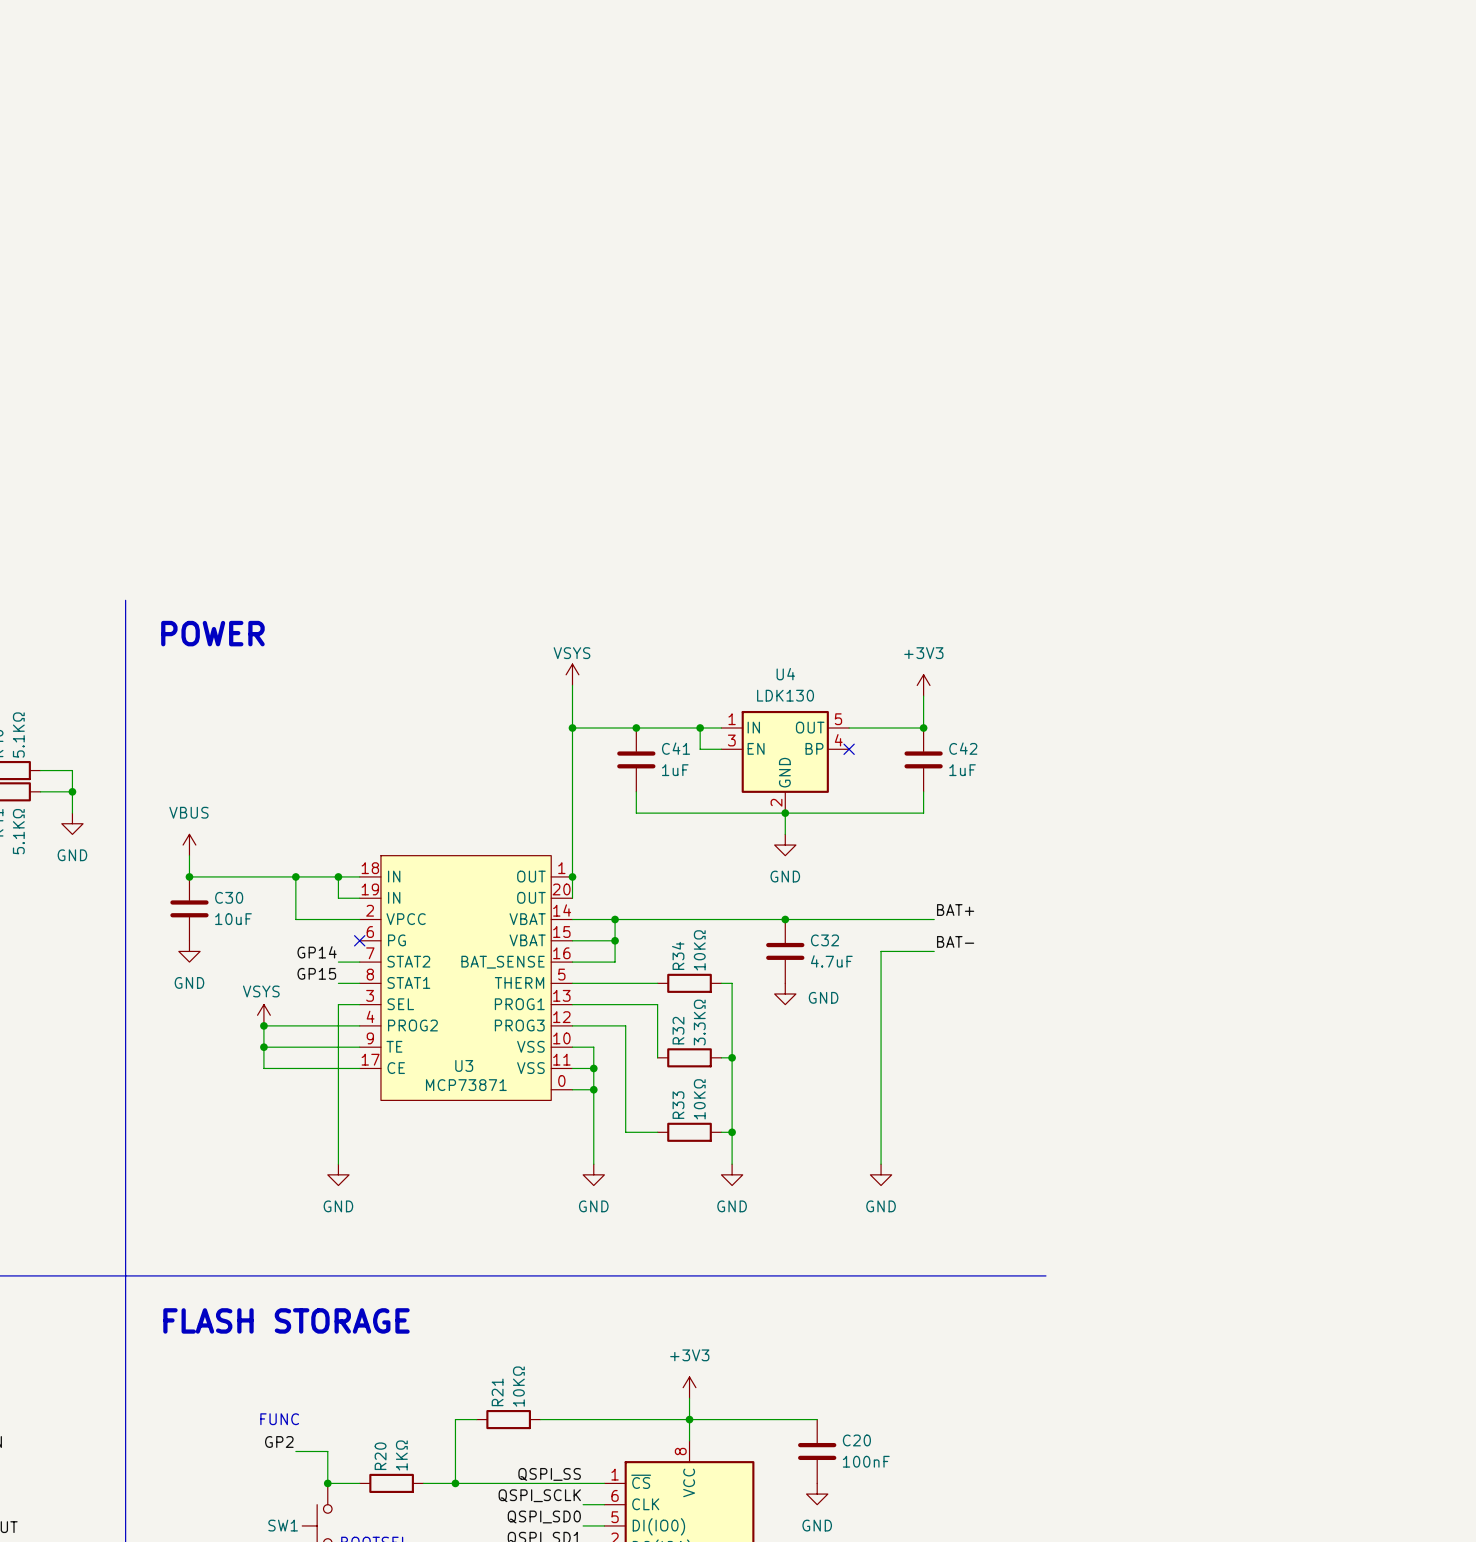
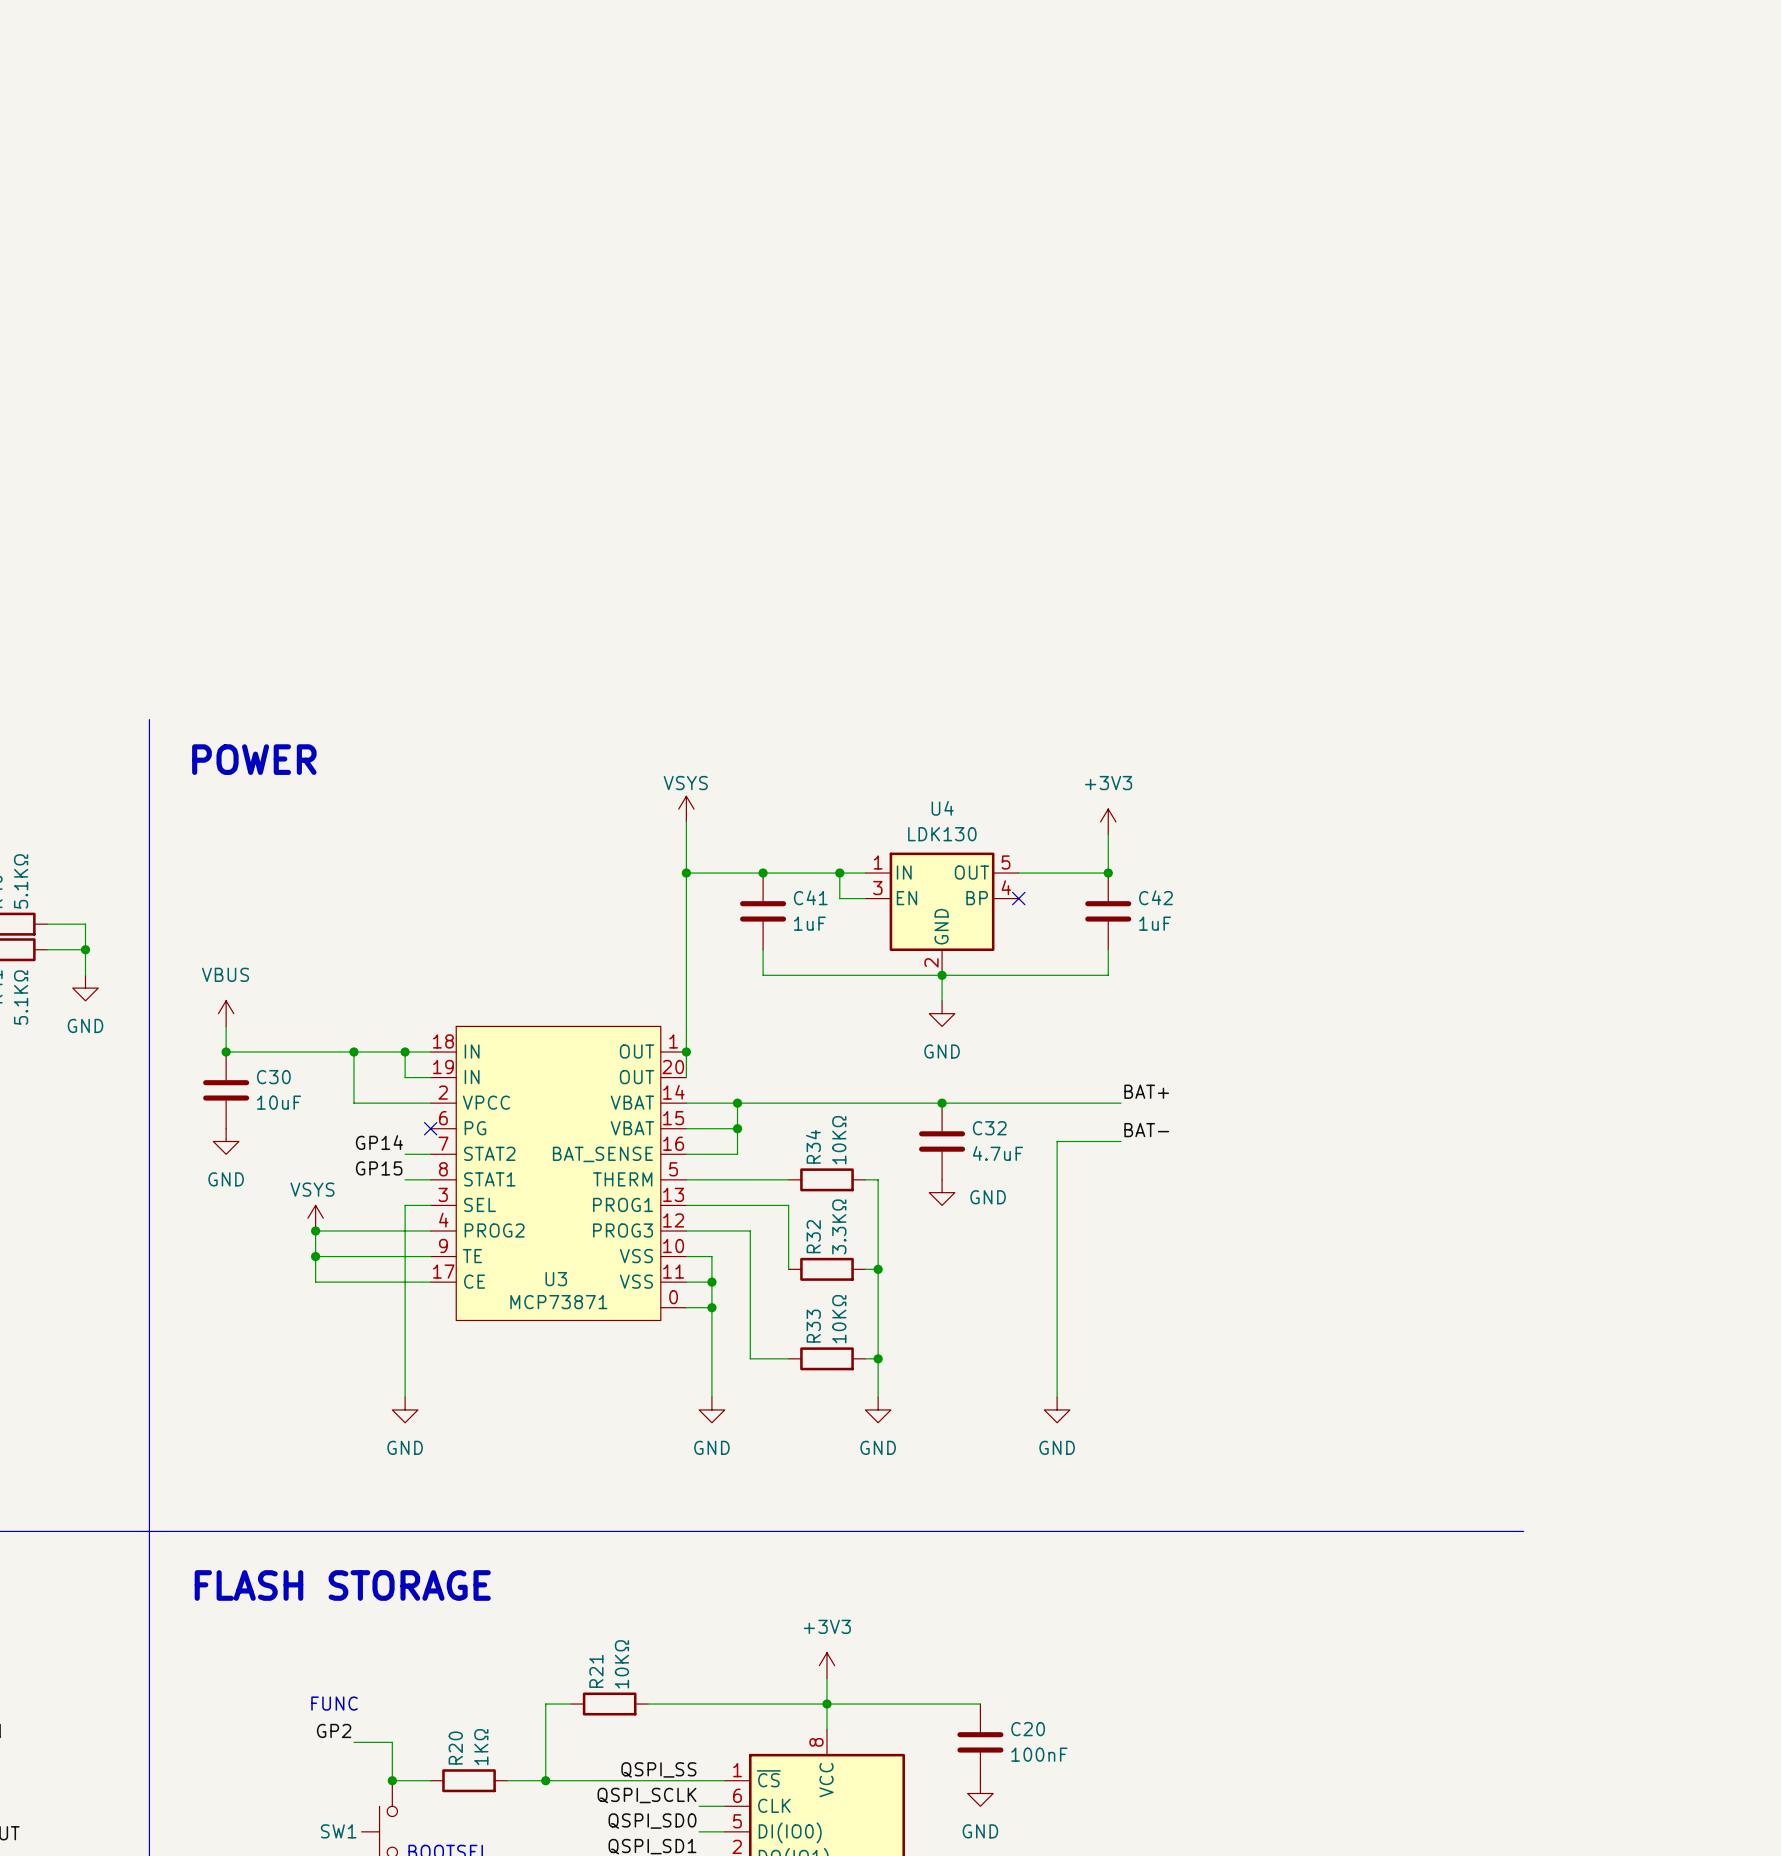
line: none -> (1255, 1531) (1523, 1531)

